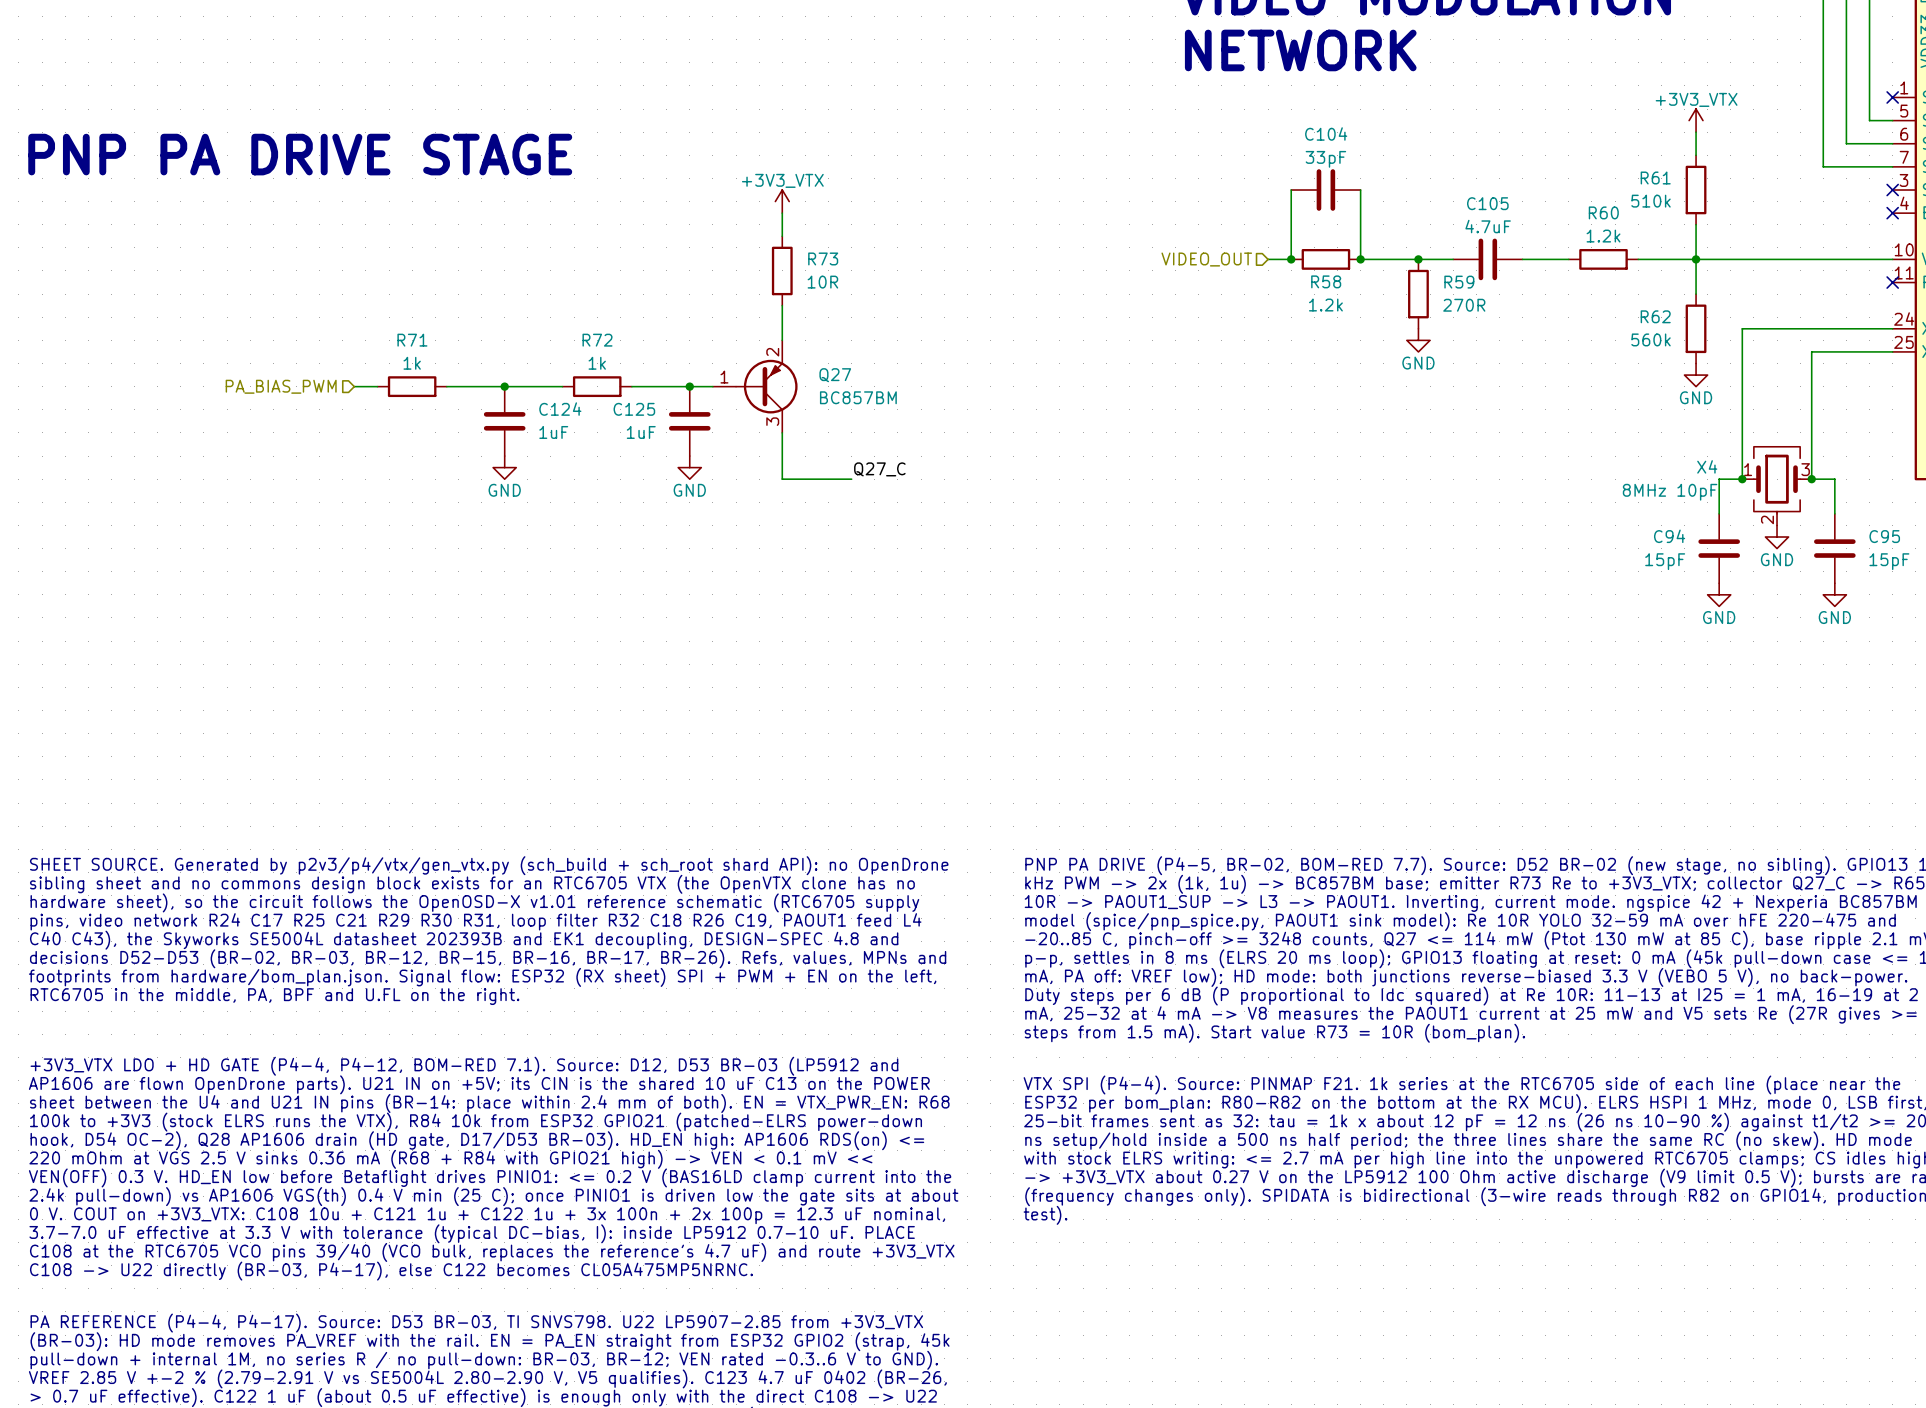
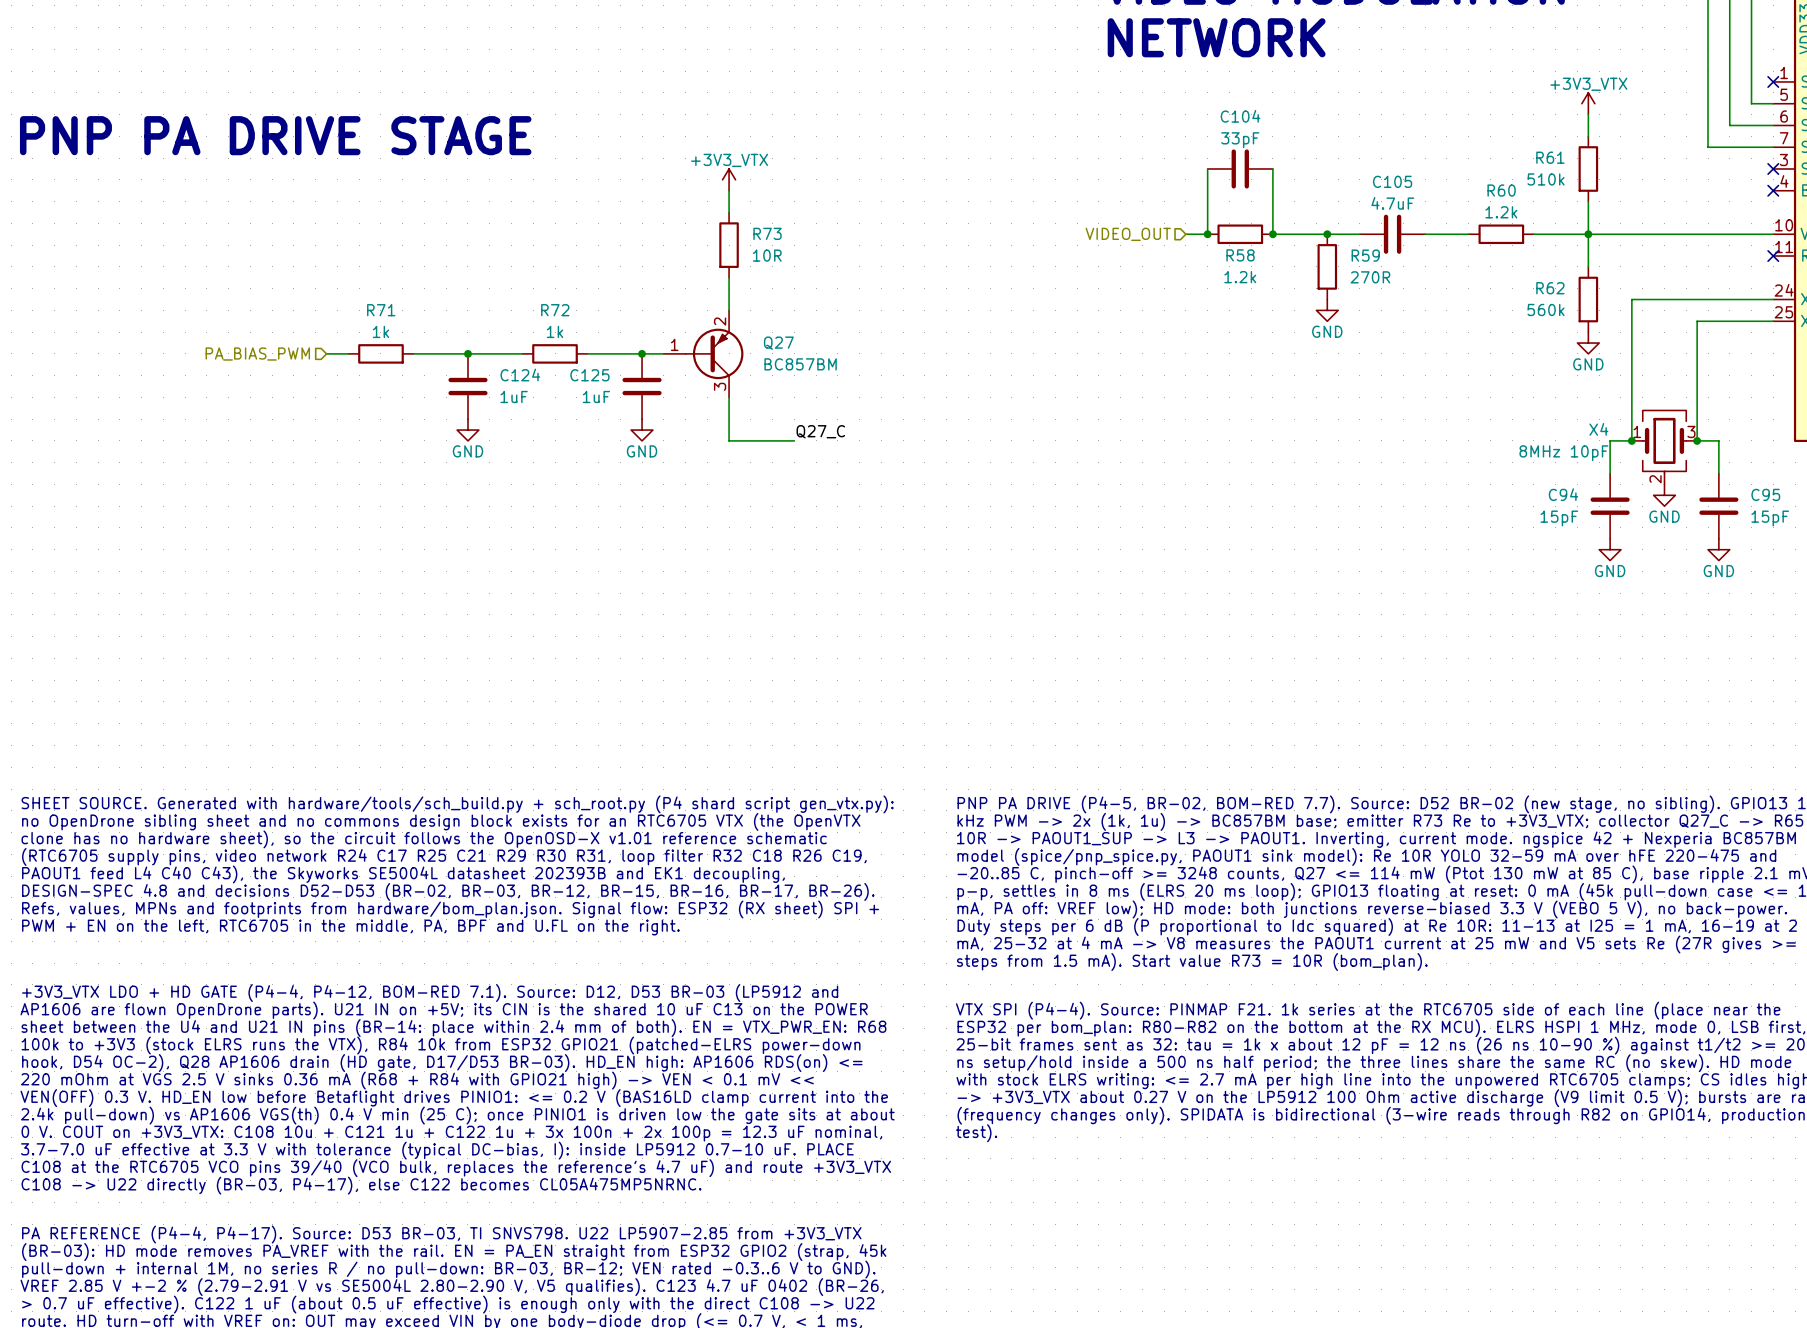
text: SHEET SOURCE. Generated by p2v3/p4/vtx/gen_vtx.py (sch_build + sch_root shard API): no OpenDrone (489, 865) -> SHEET SOURCE. Generated with hardware/tools/sch_build.py + sch_root.py (P4 shard script gen_vtx.py): (457, 804)
text: sibling sheet and no commons design block exists for an RTC6705 VTX (the OpenVTX clone has no (472, 884) -> no OpenDrone sibling sheet and no commons design block exists for an RTC6705 VTX (the OpenVTX (441, 821)
text: hardware sheet), so the circuit follows the OpenOSD-X v1.01 reference schematic (RTC6705 supply (474, 902) -> clone has no hardware sheet), so the circuit follows the OpenOSD-X v1.01 reference schematic (424, 839)
text: pins, video network R24 C17 R25 C21 R29 R30 R31, loop filter R32 C18 R26 C19, PAOUT1 feed L4 (476, 921) -> (RTC6705 supply pins, video network R24 C17 R25 C21 R29 R30 R31, loop filter R32 C18 R26 C19, (444, 856)
text: C40 C43), the Skyworks SE5004L datasheet 202393B and EK1 decoupling, DESIGN-SPEC 4.8 and (464, 940) -> PAOUT1 feed L4 C40 C43), the Skyworks SE5004L datasheet 202393B and EK1 decoupling, (403, 874)
text: decisions D52-D53 (BR-02, BR-03, BR-12, BR-15, BR-16, BR-17, BR-26). Refs, values, MPNs and (488, 958) -> DESIGN-SPEC 4.8 and decisions D52-D53 (BR-02, BR-03, BR-12, BR-15, BR-16, BR-17, BR-26). (448, 891)
text: footprints from hardware/bom_plan.json. Signal flow: ESP32 (RX sheet) SPI + PWM + EN on the left, (482, 977) -> Refs, values, MPNs and footprints from hardware/bom_plan.json. Signal flow: ESP32 (RX sheet) SPI + (450, 909)
text: RTC6705 in the middle, PA, BPF and U.FL on the right. (274, 996) -> PWM + EN on the left, RTC6705 in the middle, PA, BPF and U.FL on the right. (350, 927)

